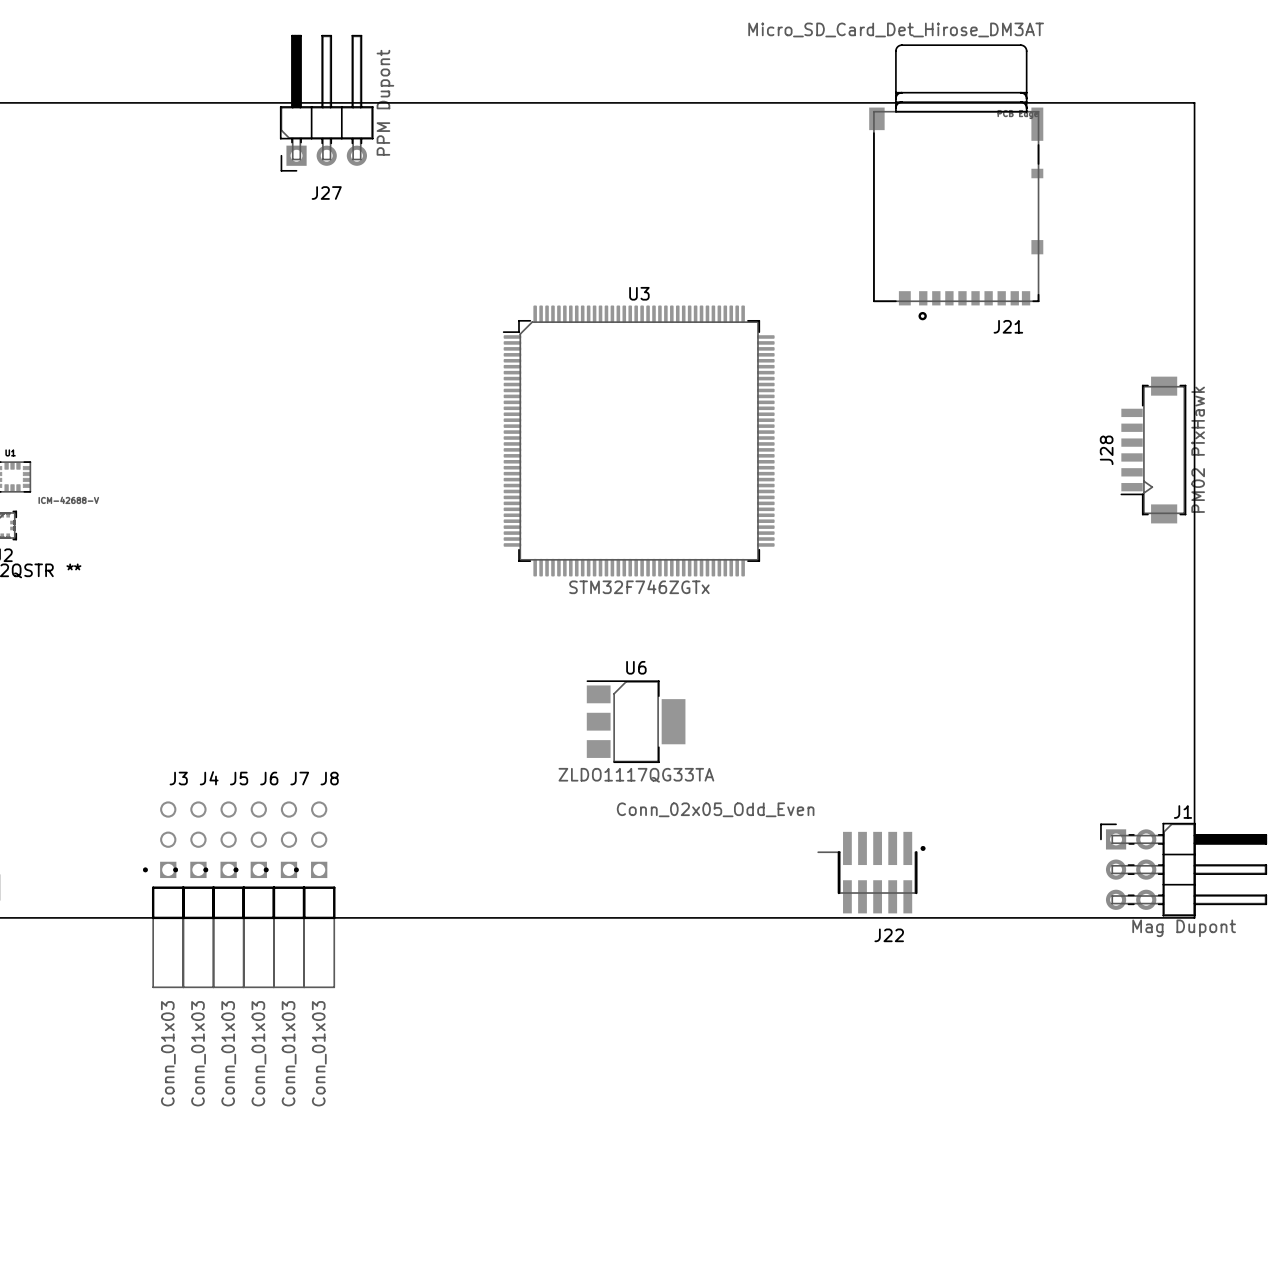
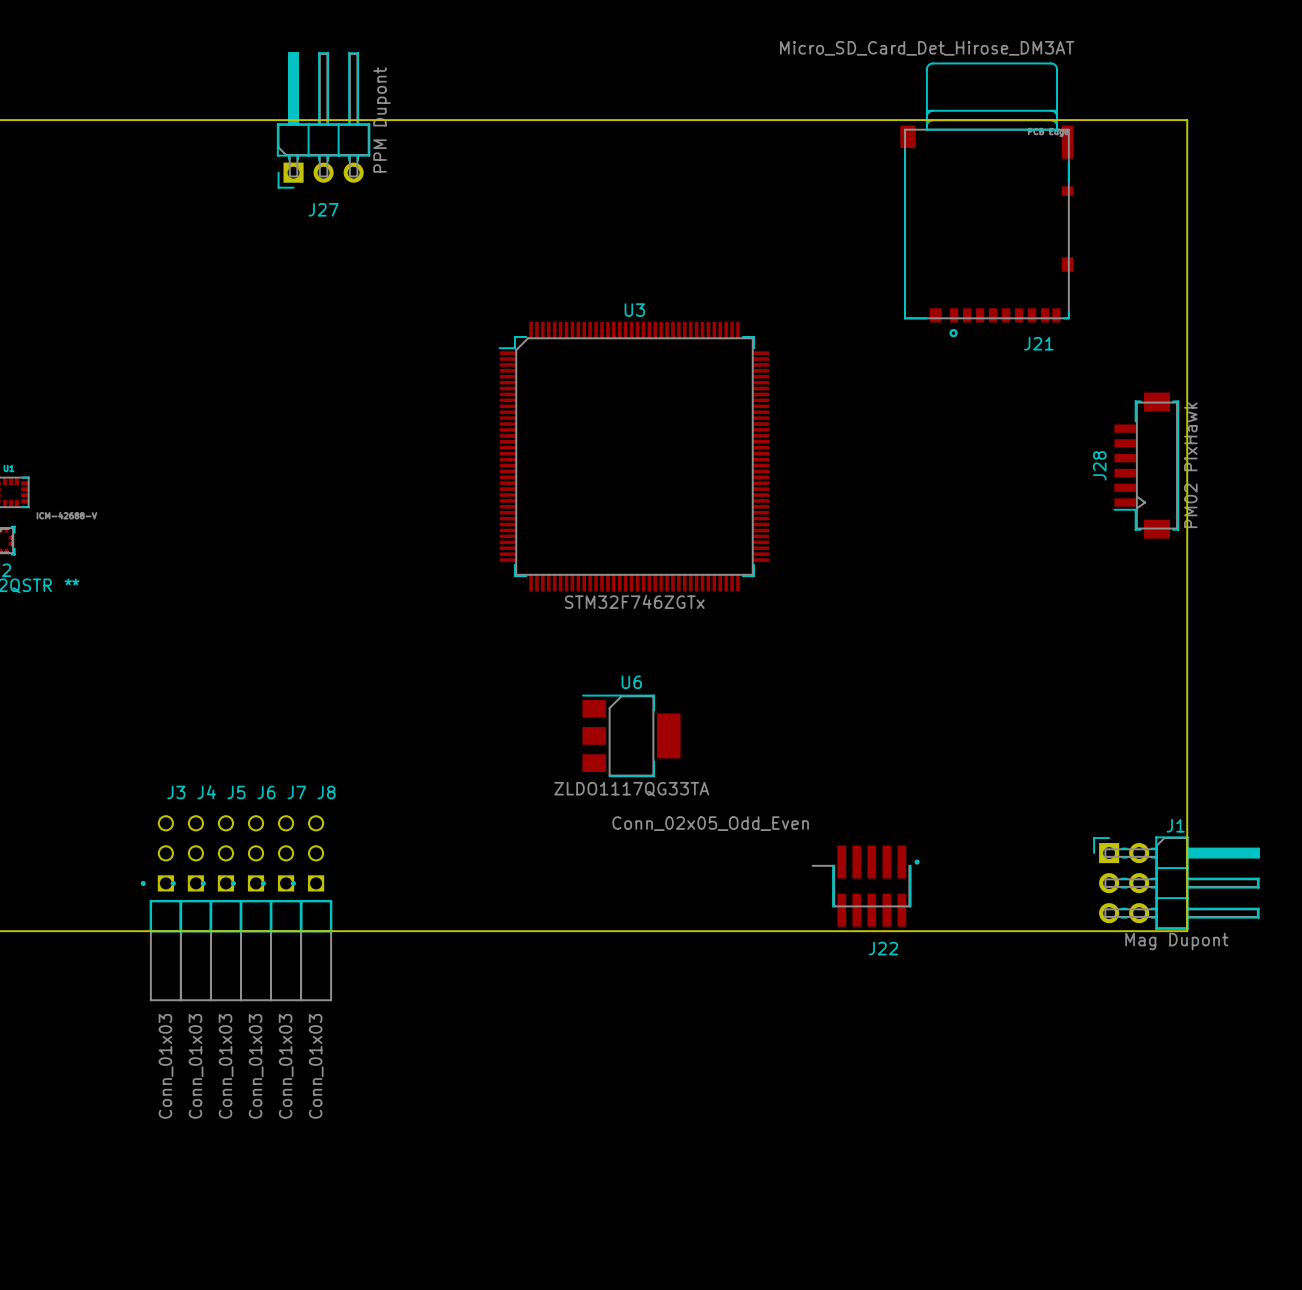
J21 position: (956, 182) -> (986, 199)

